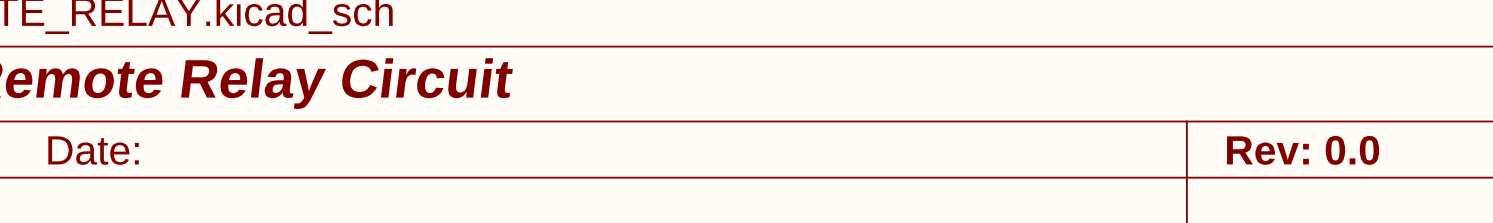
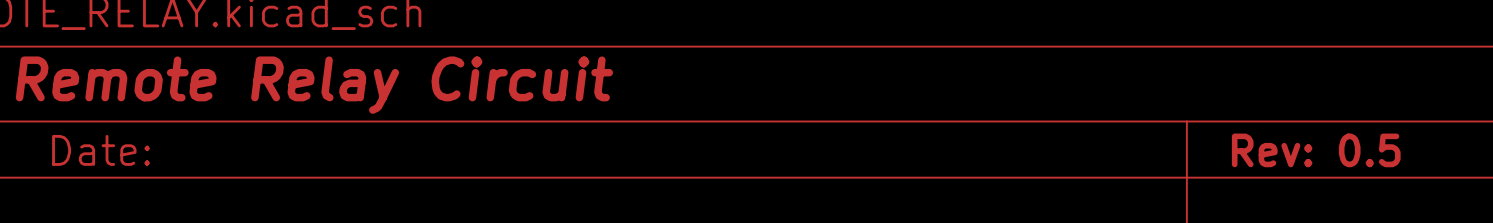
title block: Rev: 0.0 (1303, 150) -> Rev: 0.5 (1316, 150)

